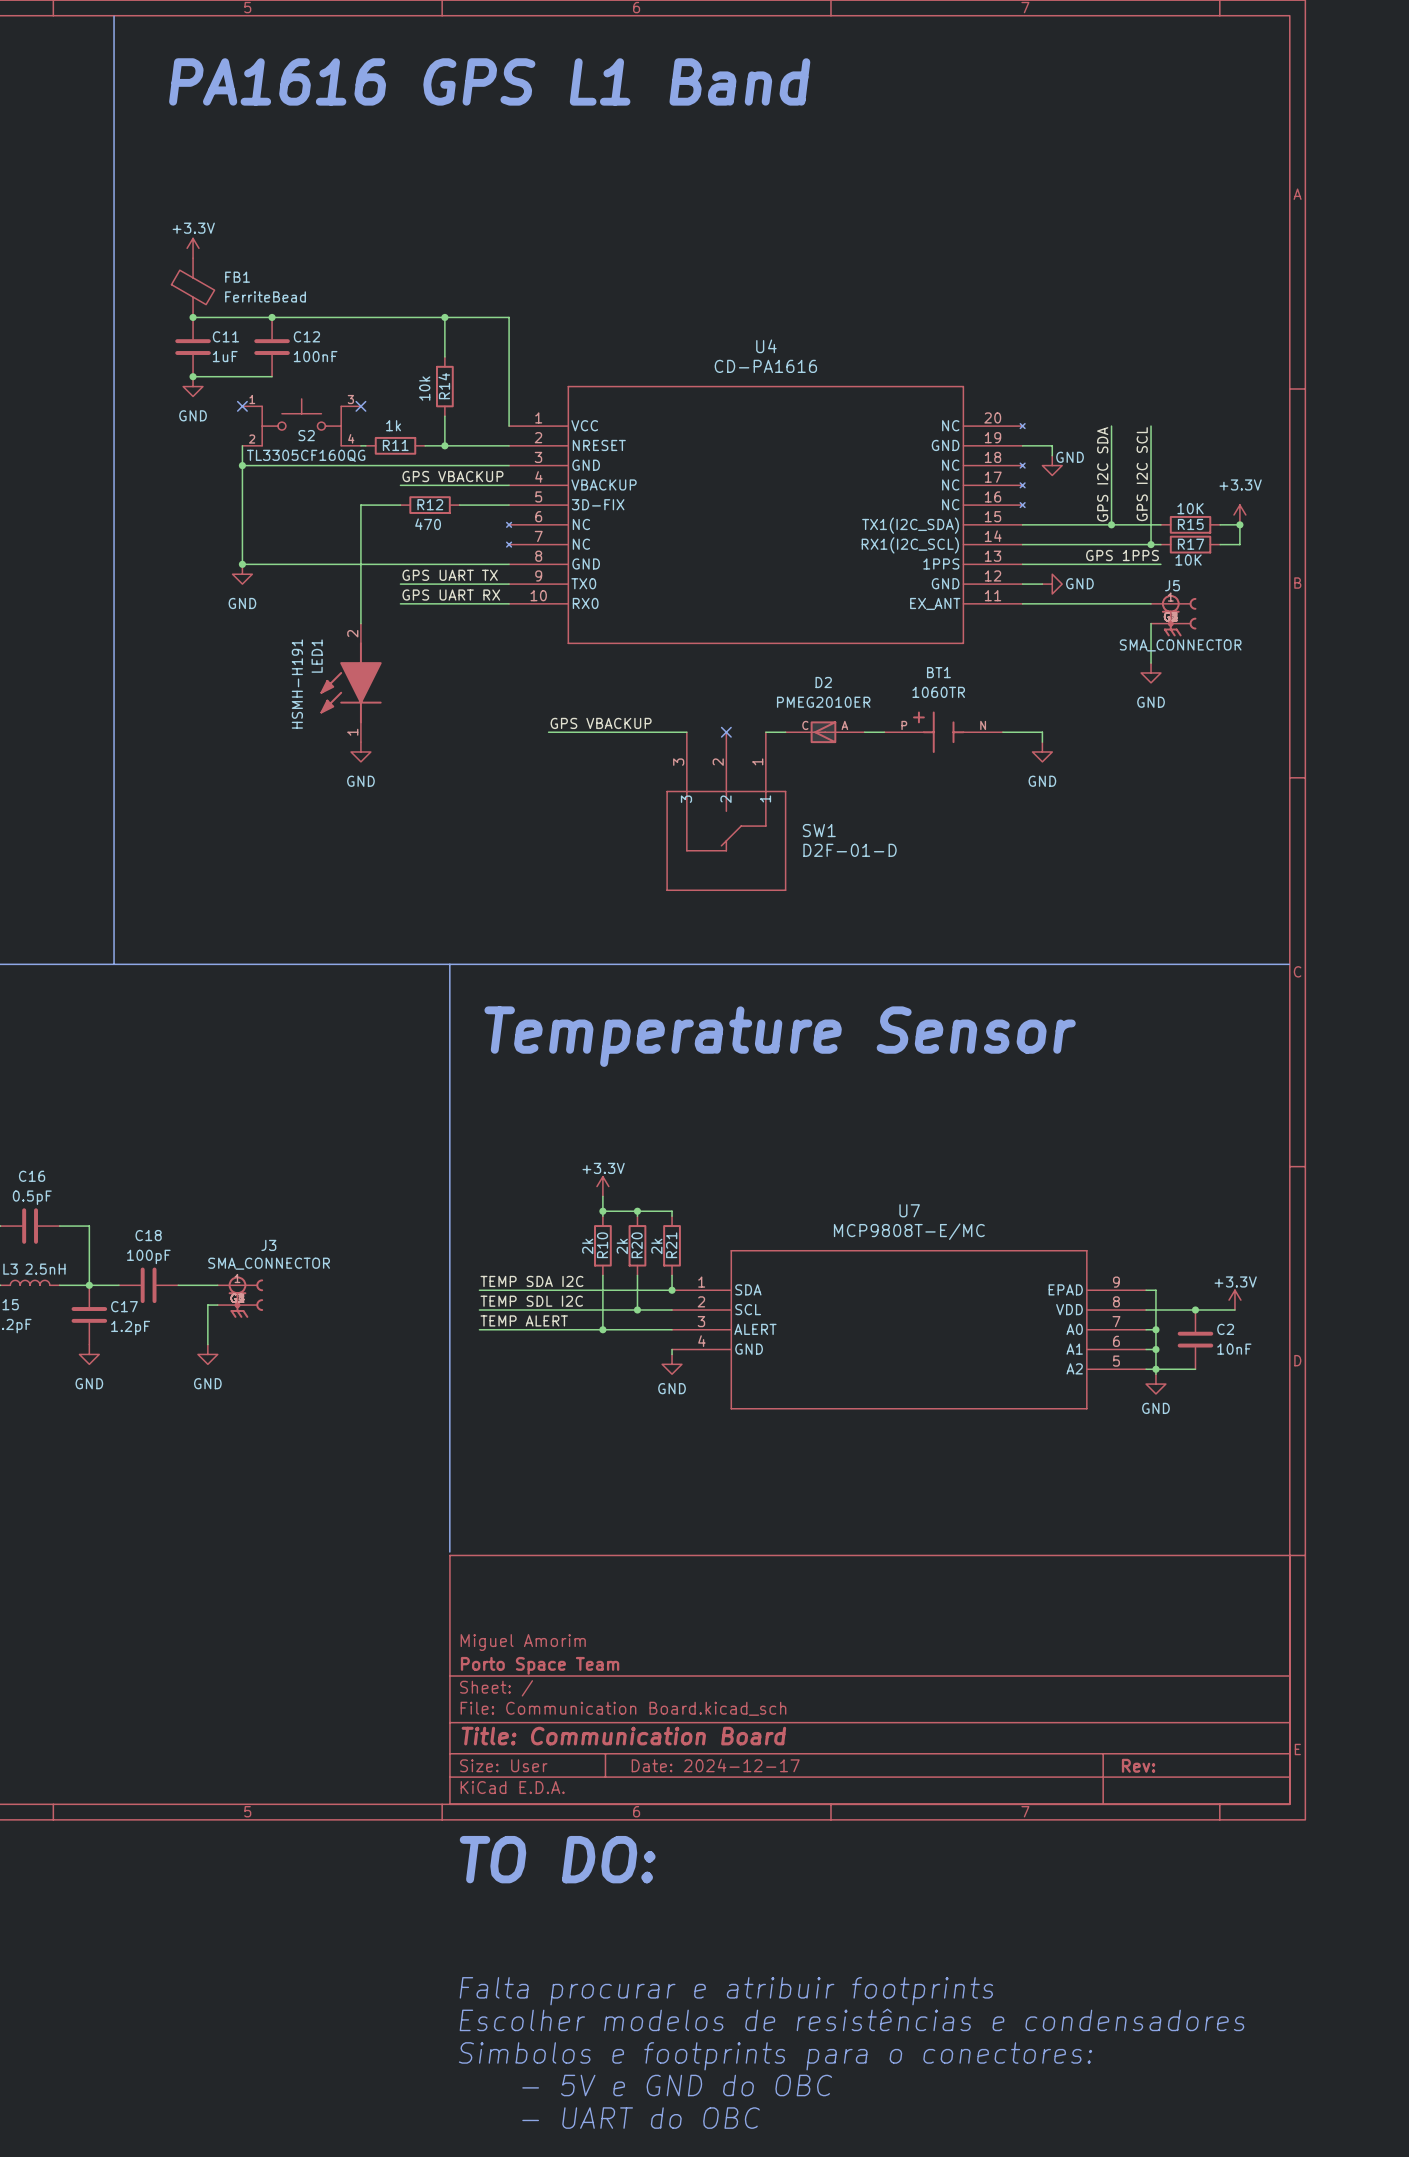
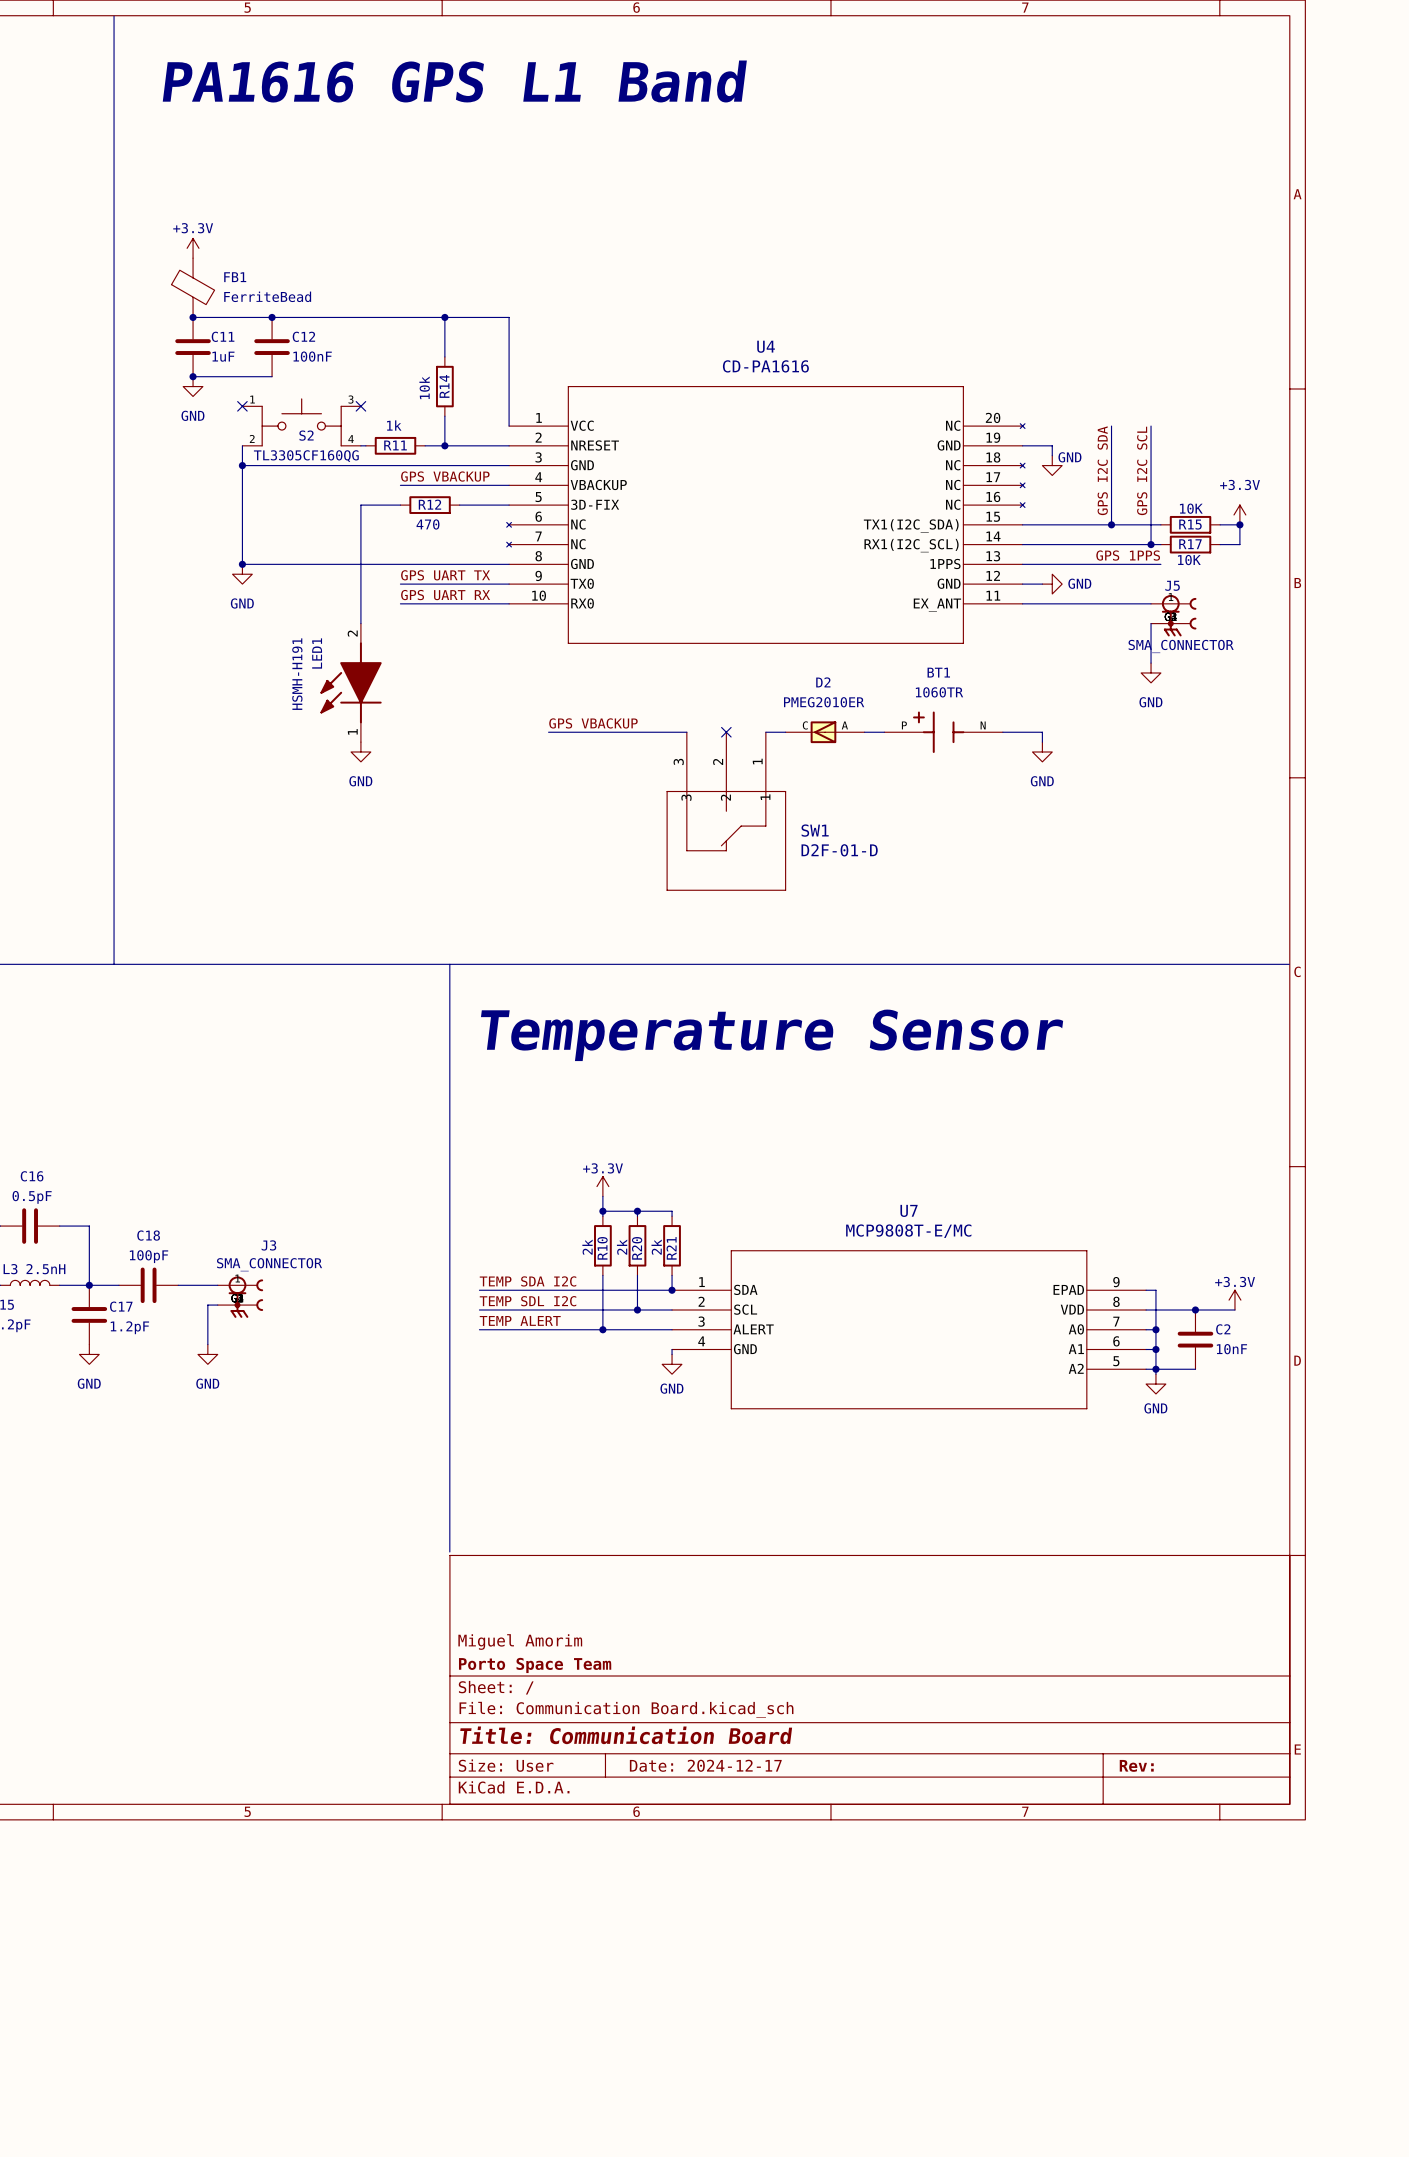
text: TO DO: (557, 1859) -> none
text: Falta procurar e atribuir footprints (726, 1991) -> none
text: Escolher modelos de resistências e condensadores (852, 2019) -> none
text: Simbolos e footprints para o conectores: (775, 2056) -> none
text: - 5V e GND do OBC (677, 2085) -> none
text: - UART do OBC (641, 2118) -> none

